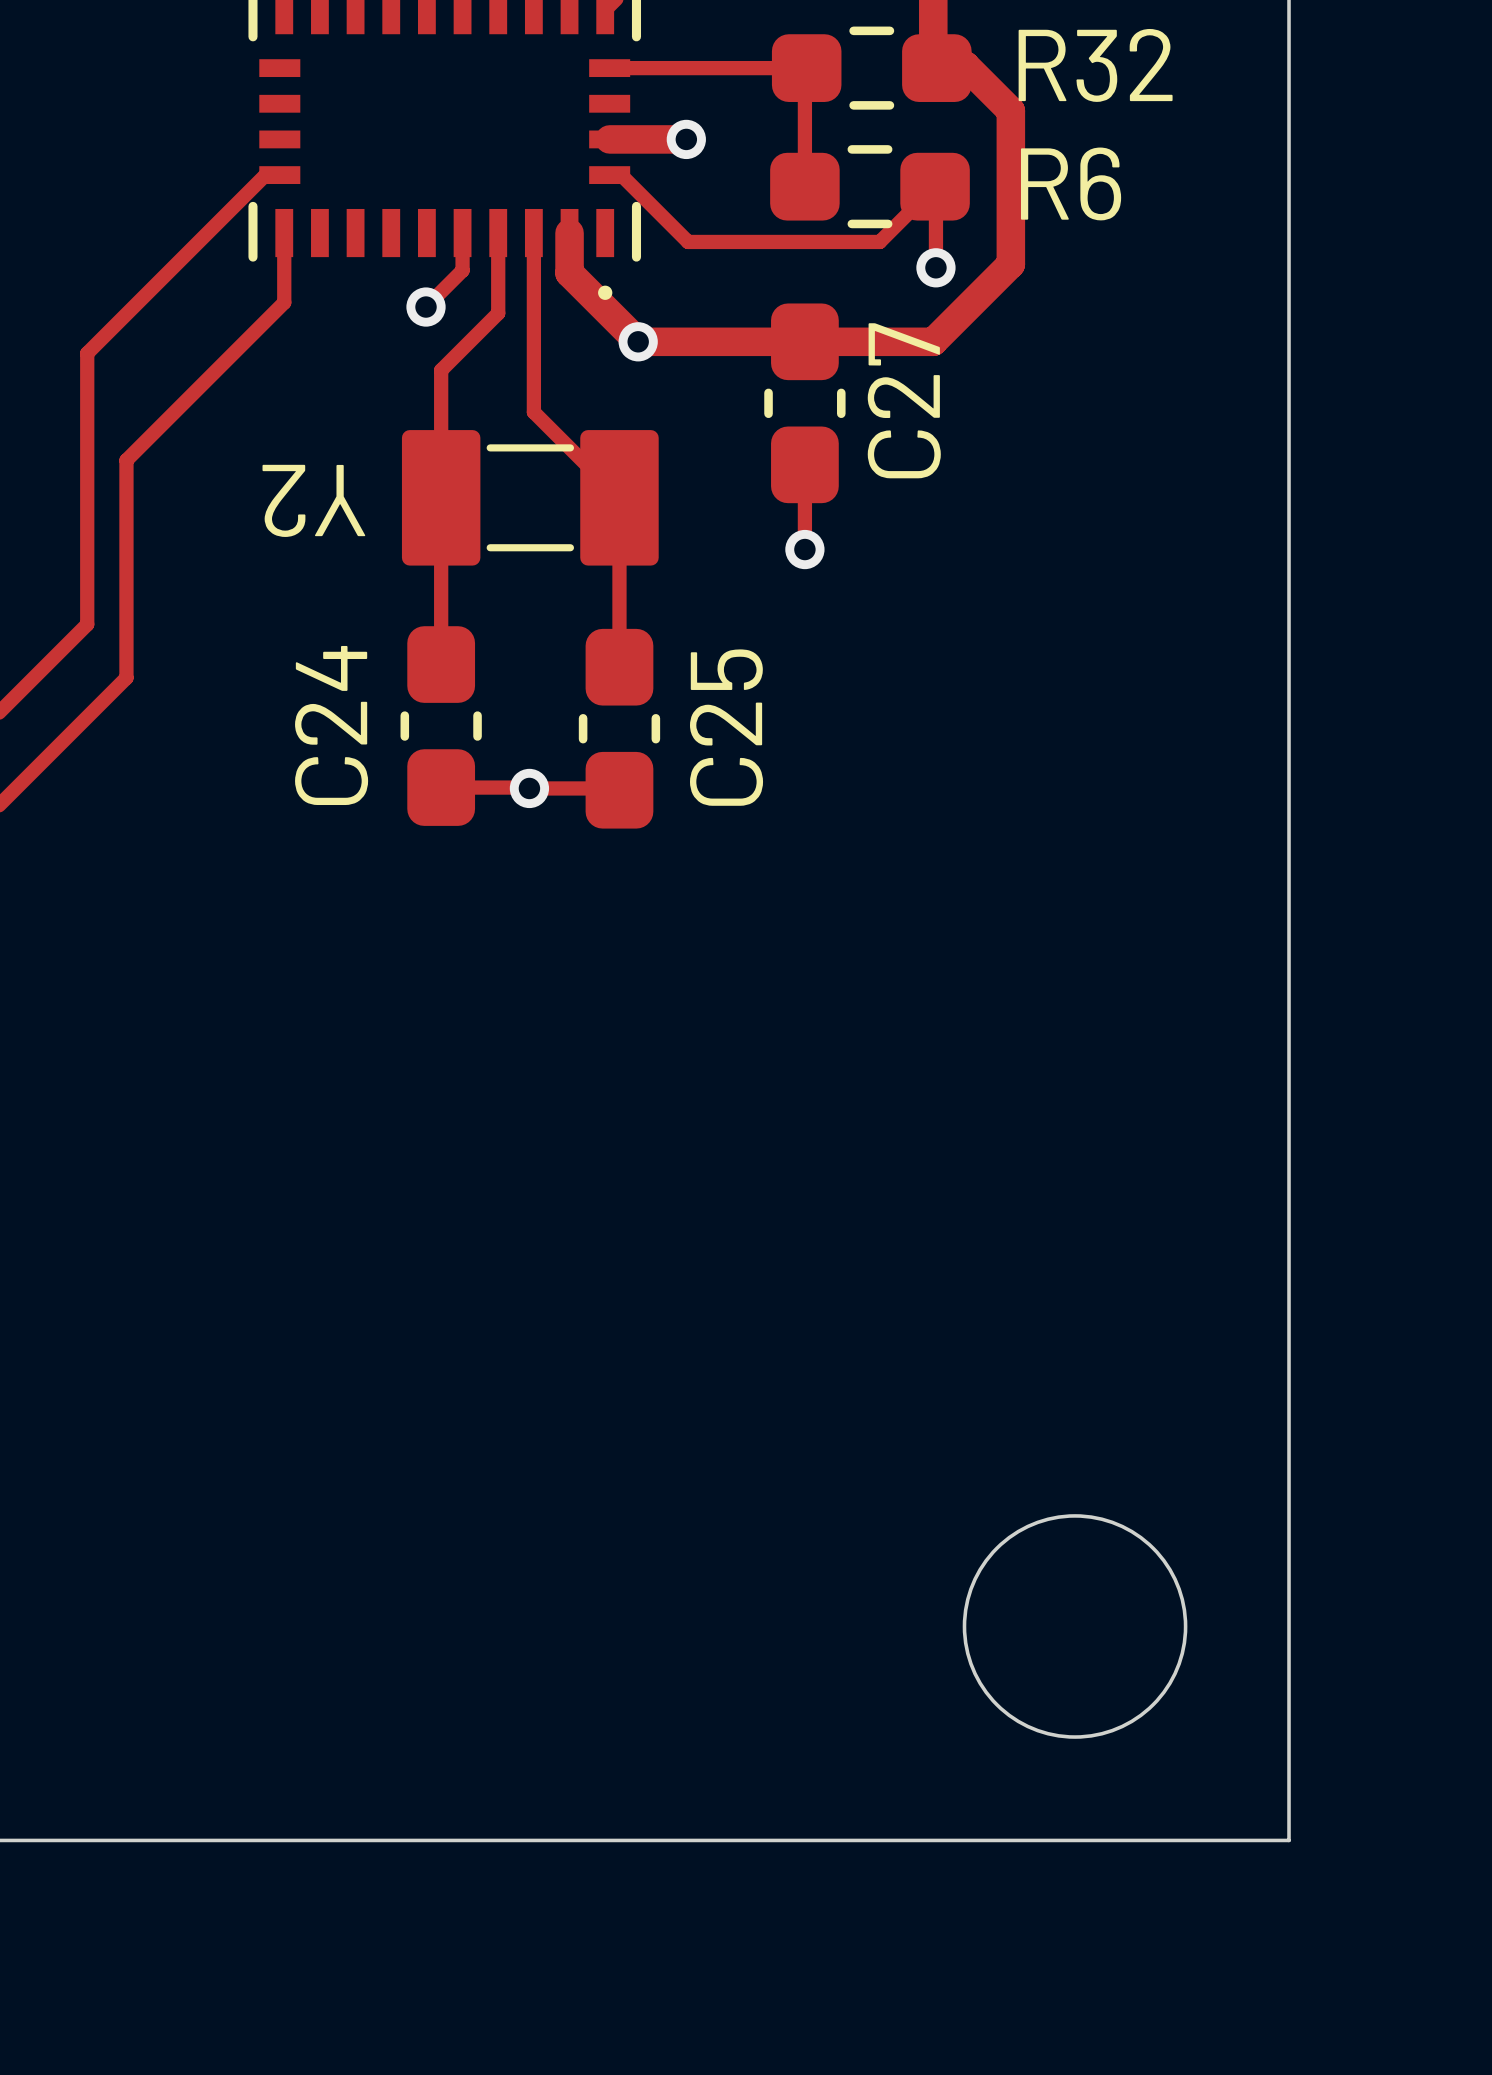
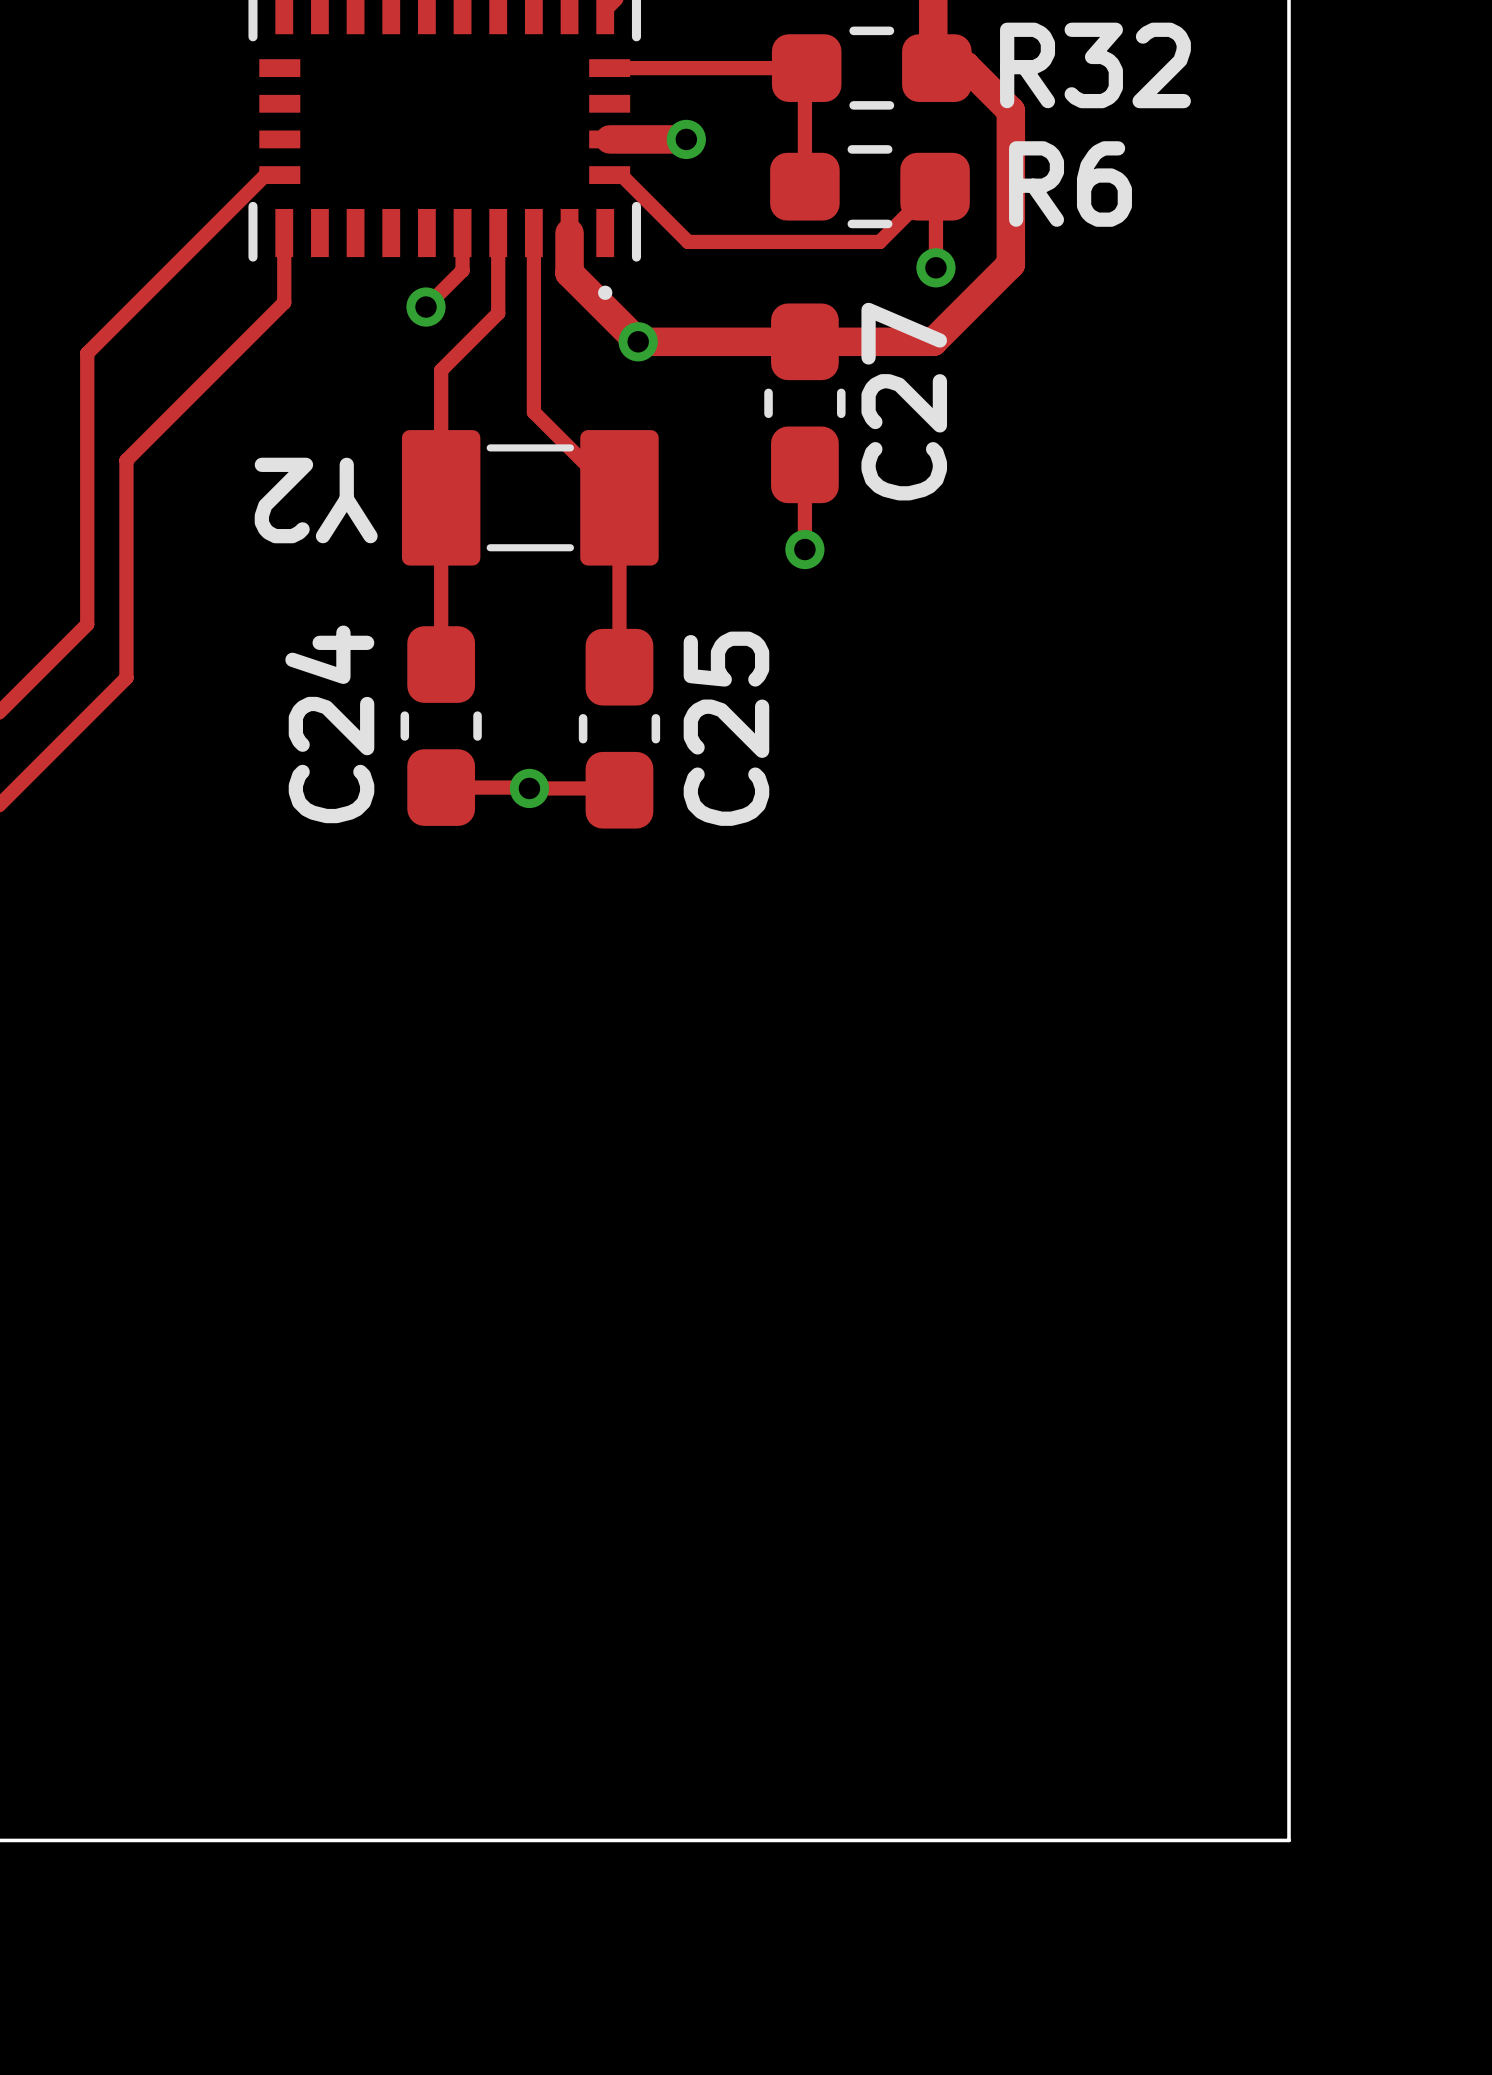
round board edge: [962, 1514, 1188, 1739] -> none

